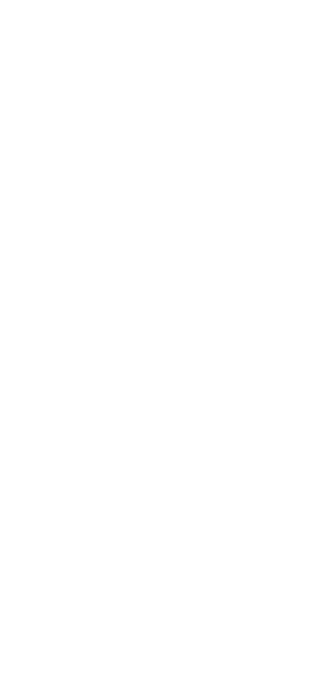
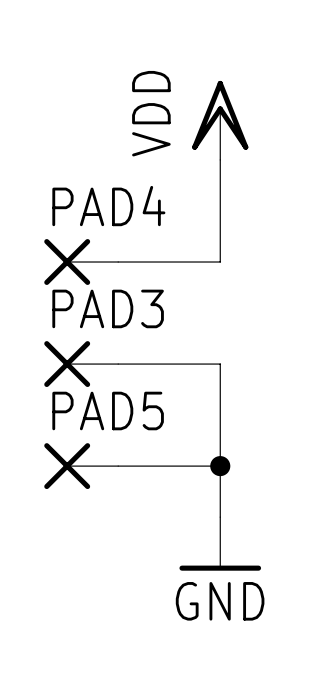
power symbol: none -> VDD (220, 120)
wire: none -> (220, 159) (220, 262) (118, 262)
PAD4: none -> (81, 262)
PAD3: none -> (81, 364)
wire: none -> (118, 364) (220, 364) (220, 517)
PAD5: none -> (81, 466)
wire: none -> (118, 466) (220, 466)
junction: none -> (220, 466)
power symbol: none -> GND (220, 543)

